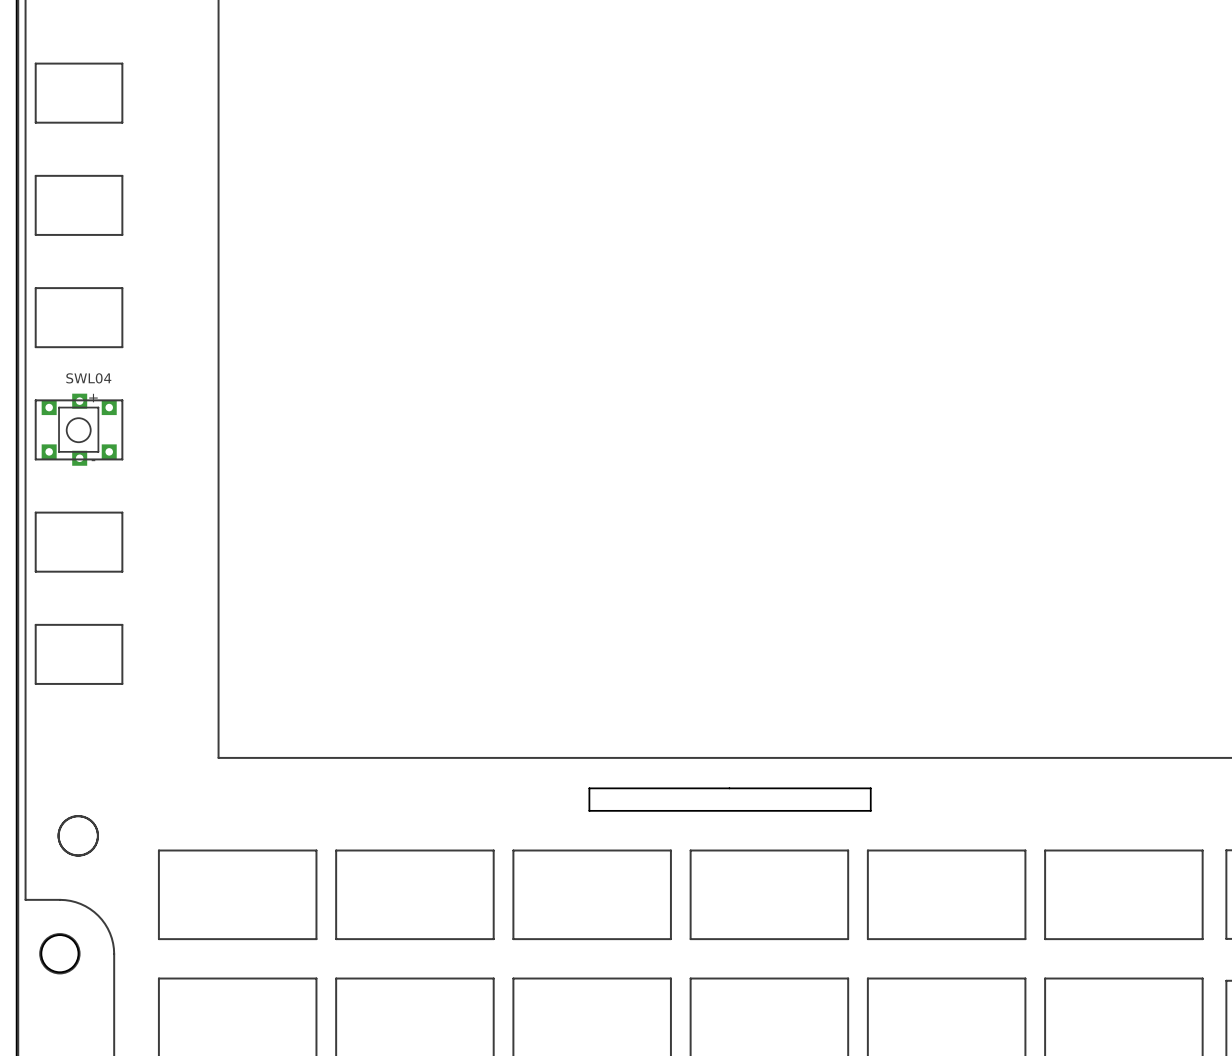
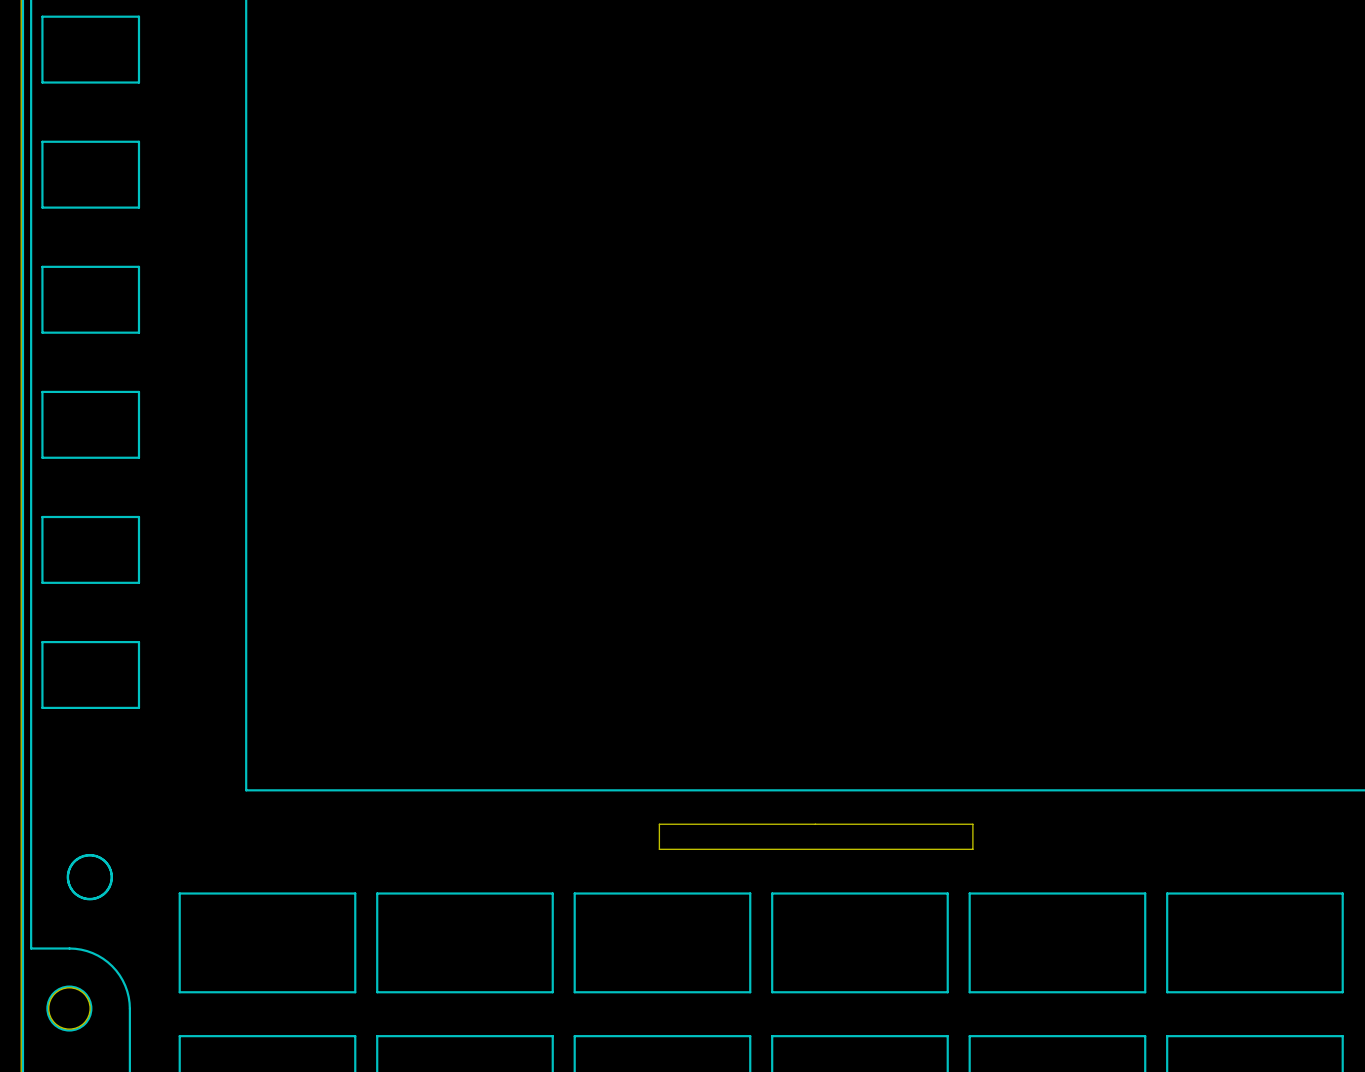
SWL04: (79, 429) -> none

